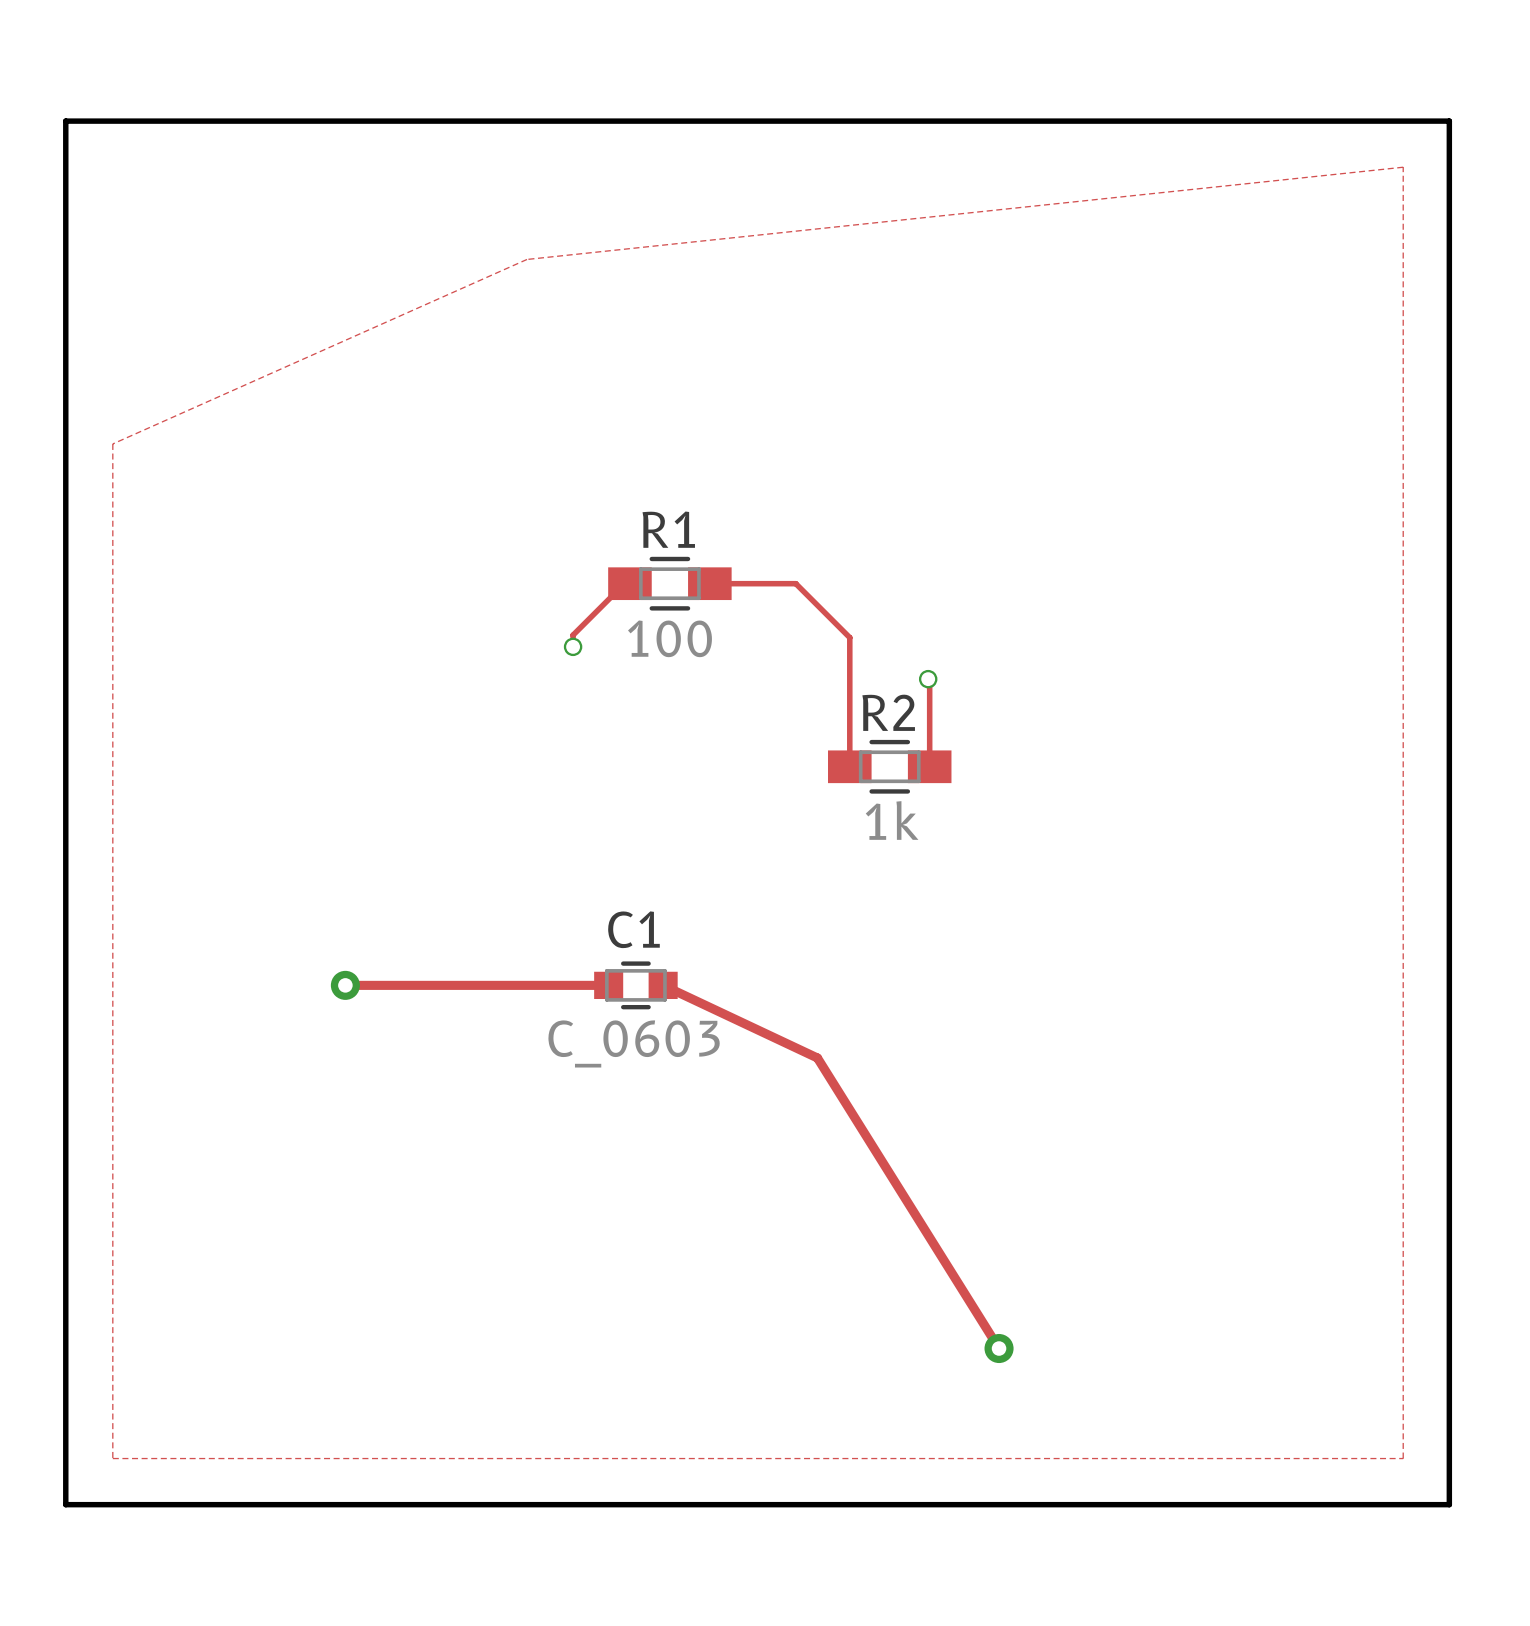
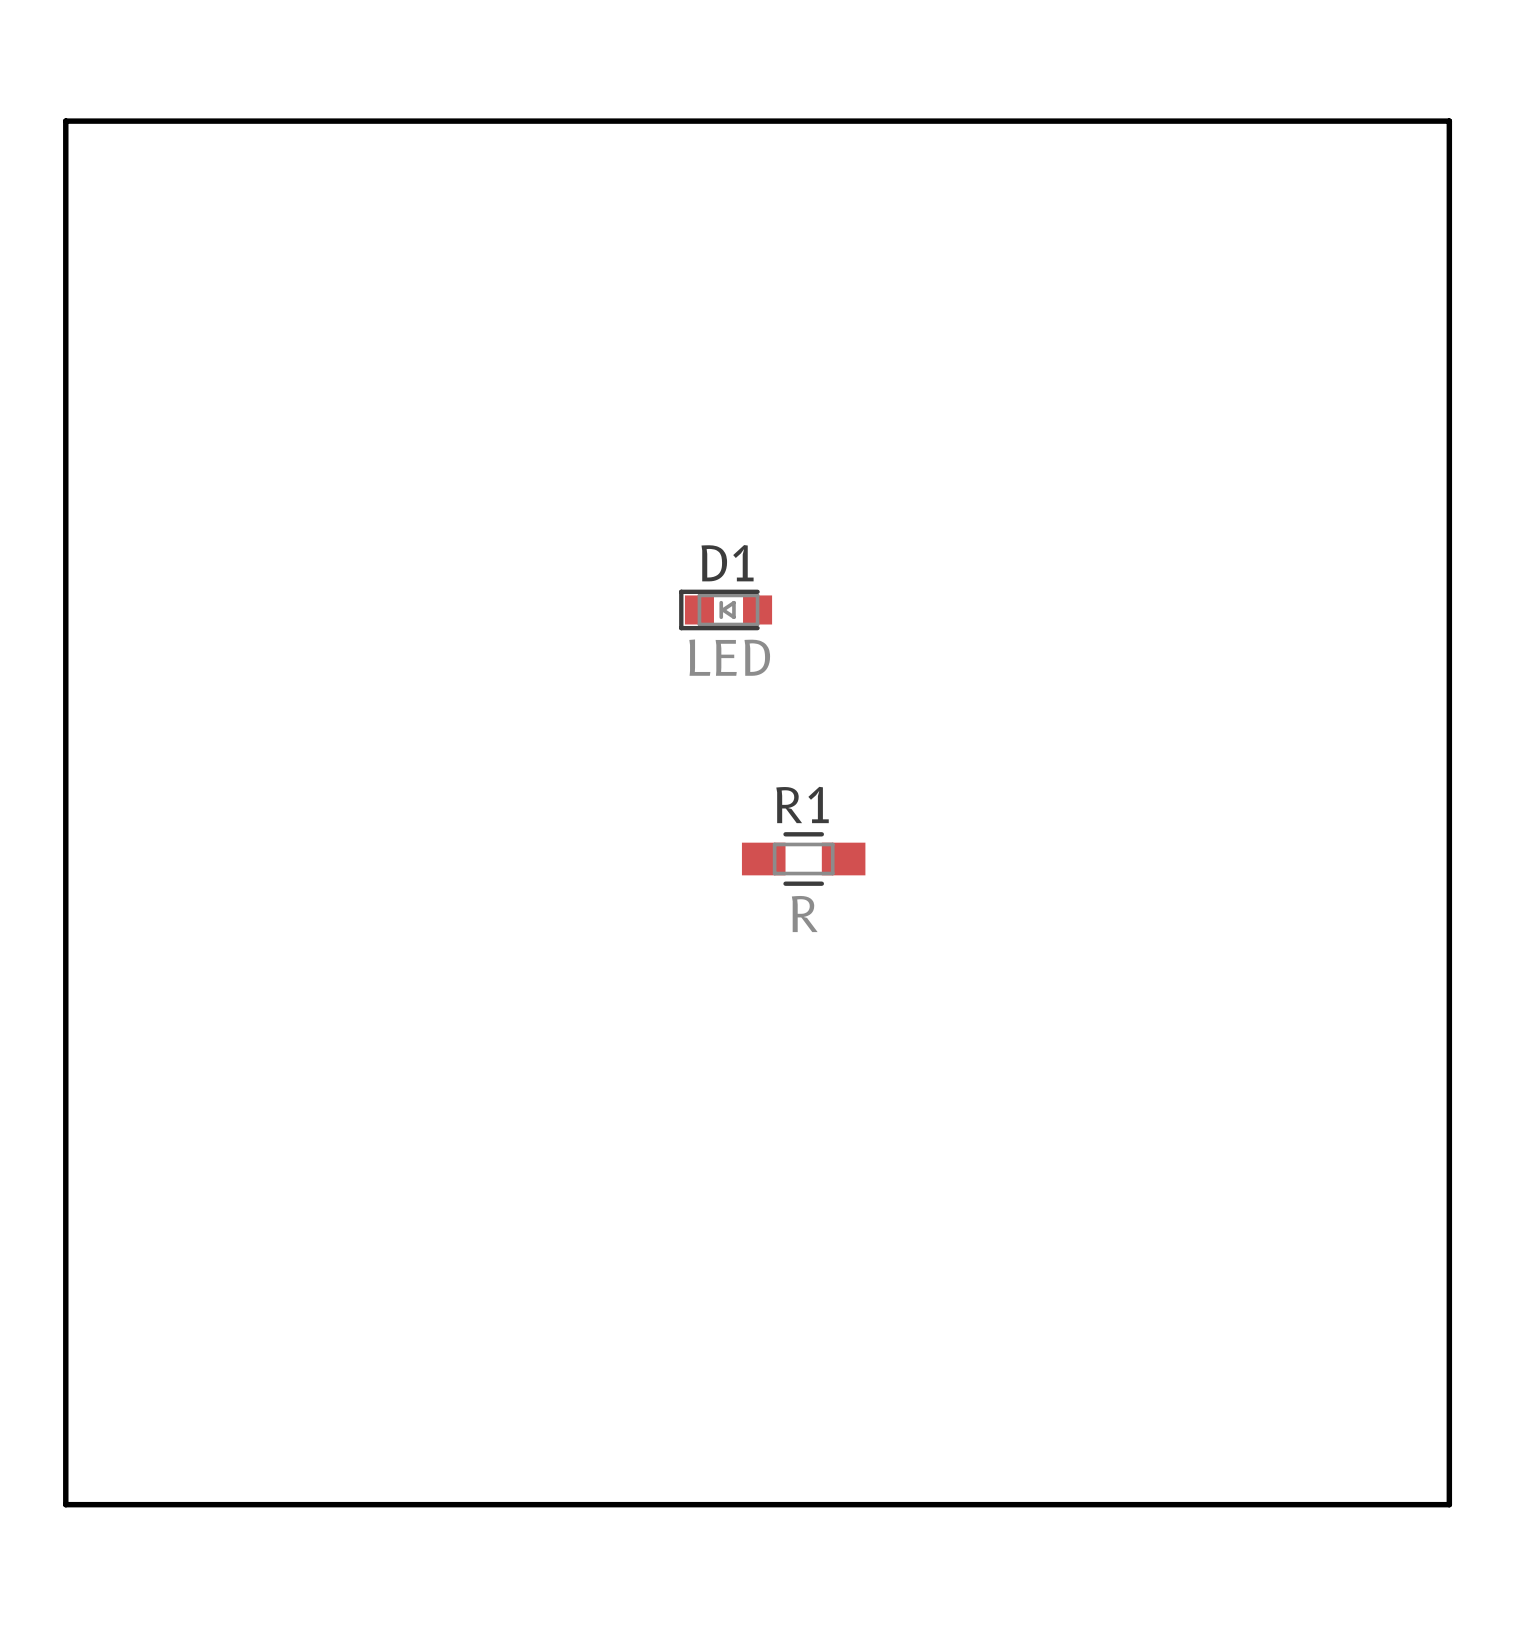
zone outline: (1403, 167) (1403, 1458) (112, 1458) (112, 443) (526, 259) (1403, 167) -> none
track: (629, 583) (624, 583) (573, 635) (573, 646) -> none
R1 position: (669, 583) -> (803, 859)
track: (709, 583) (795, 583) (849, 637) (849, 766) -> none
D1: none -> LED (725, 609)
R1 value: 100 (669, 638) -> R (804, 914)
via: (573, 646) -> none
track: (928, 679) (929, 766) -> none
via: (928, 679) -> none
R2: 1k (889, 766) -> none
track: (345, 985) (608, 985) -> none
via: (345, 985) -> none
C1: C_0603 (635, 985) -> none
track: (663, 985) (817, 1058) (999, 1348) -> none
via: (999, 1348) -> none

